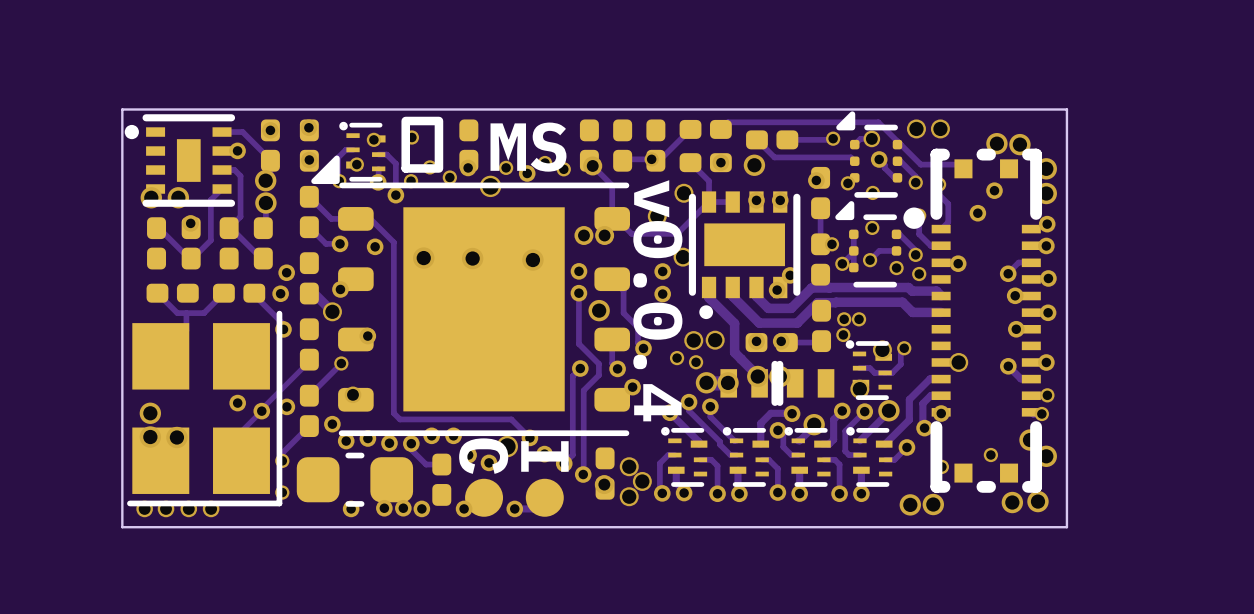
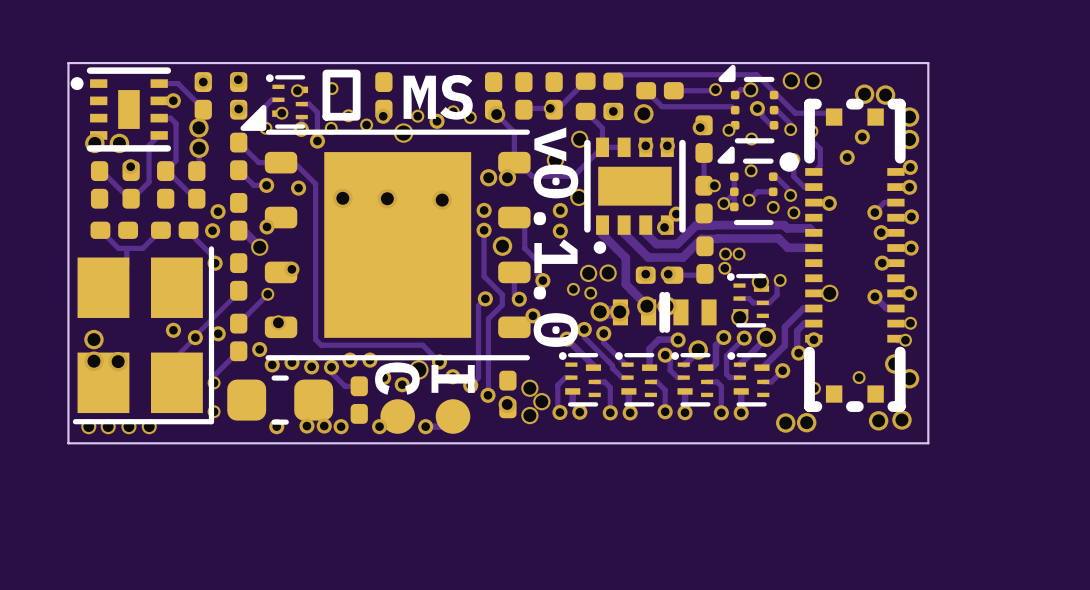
text: v0.0.4 (657, 300) -> v0.1.0 (555, 237)

